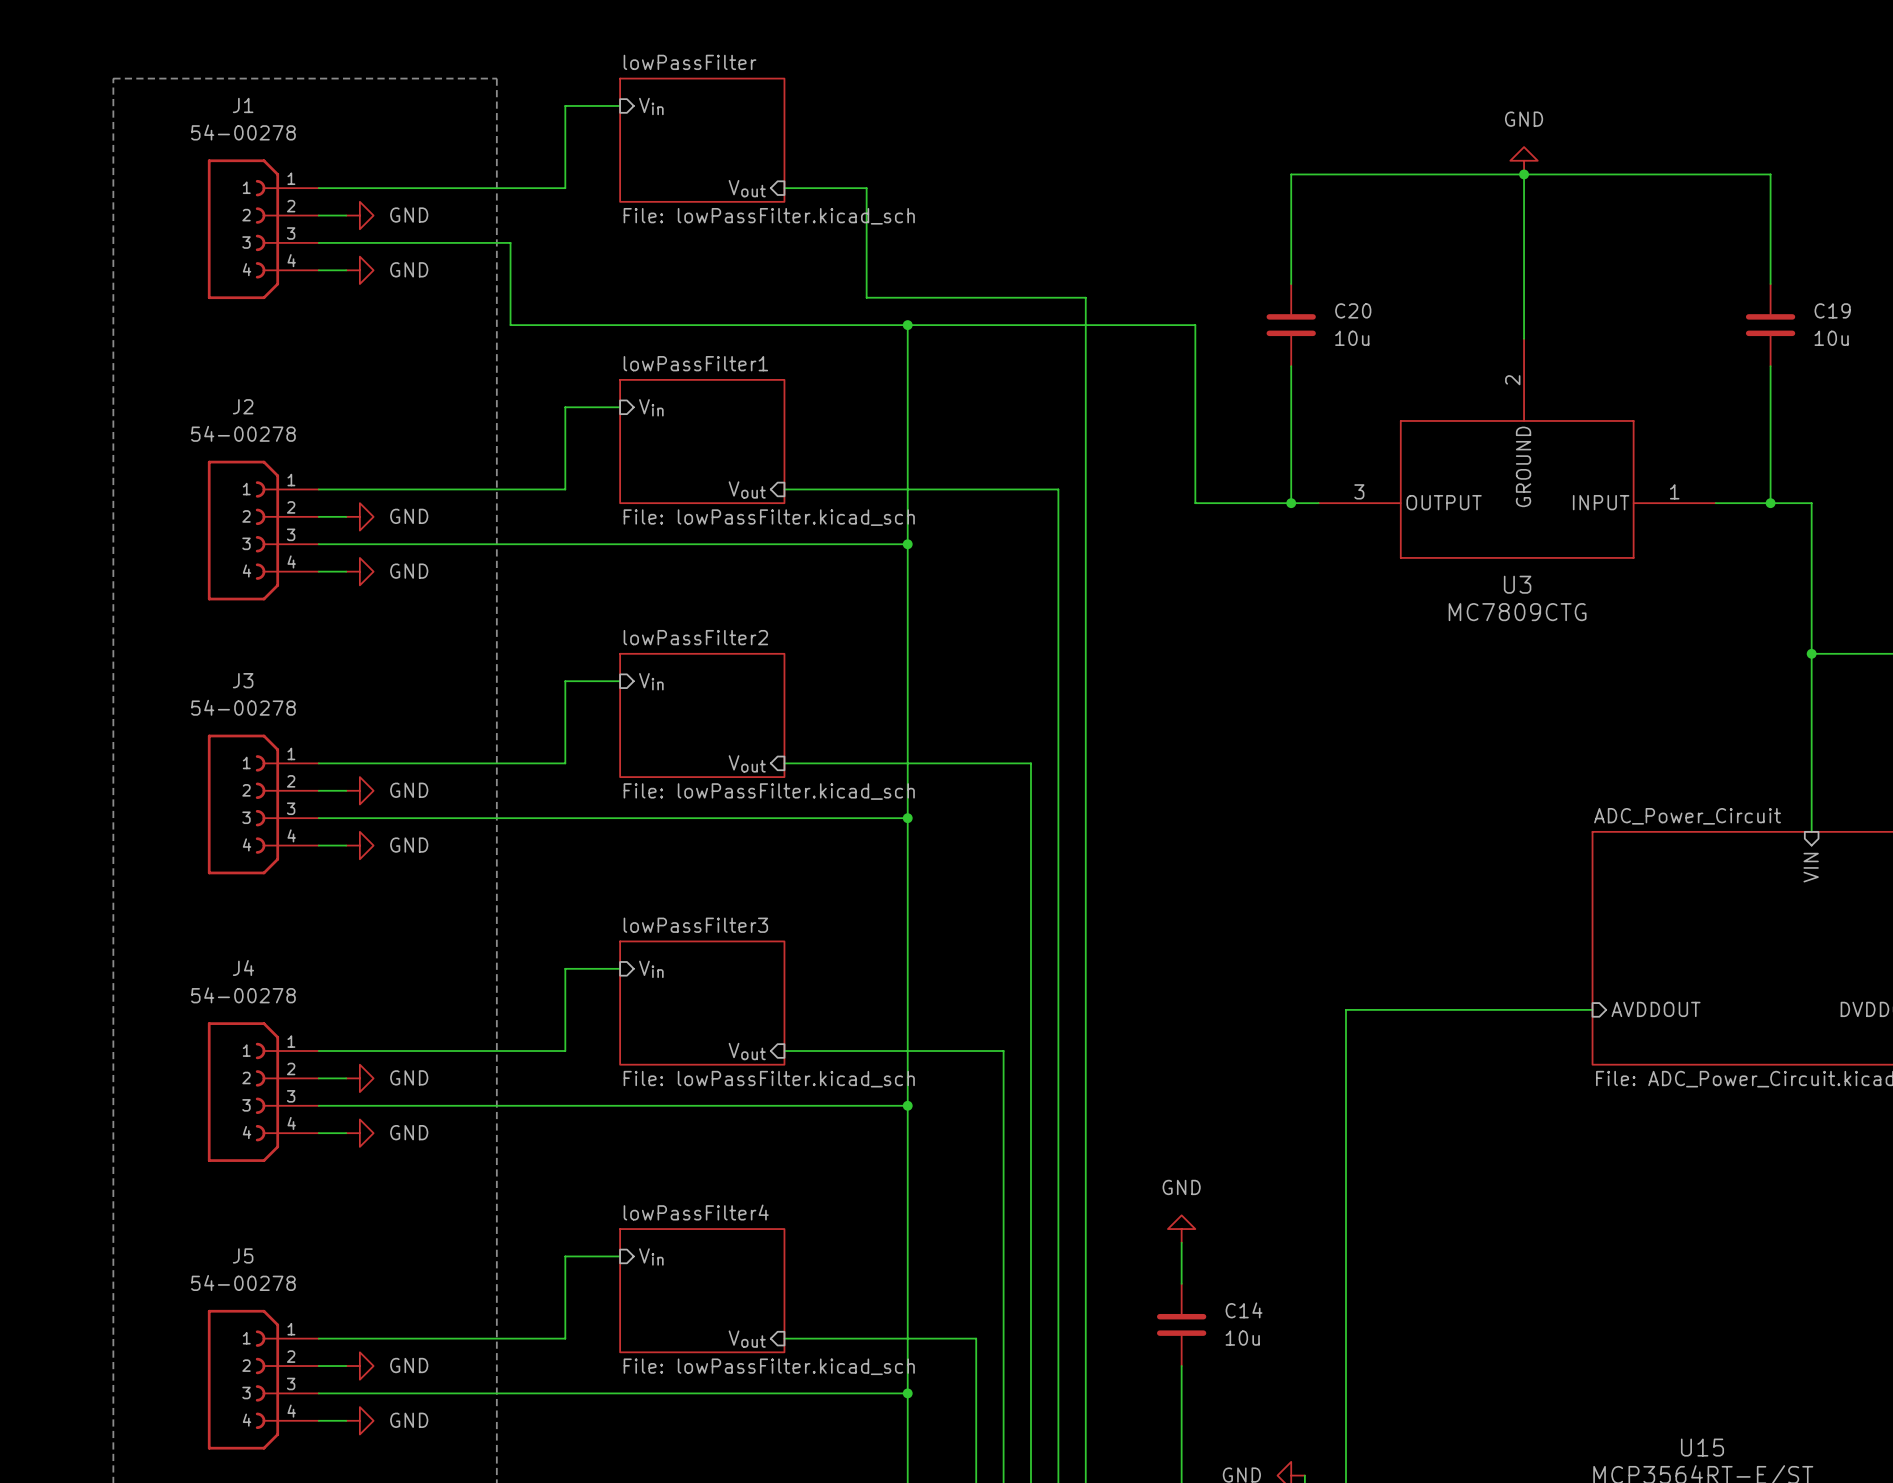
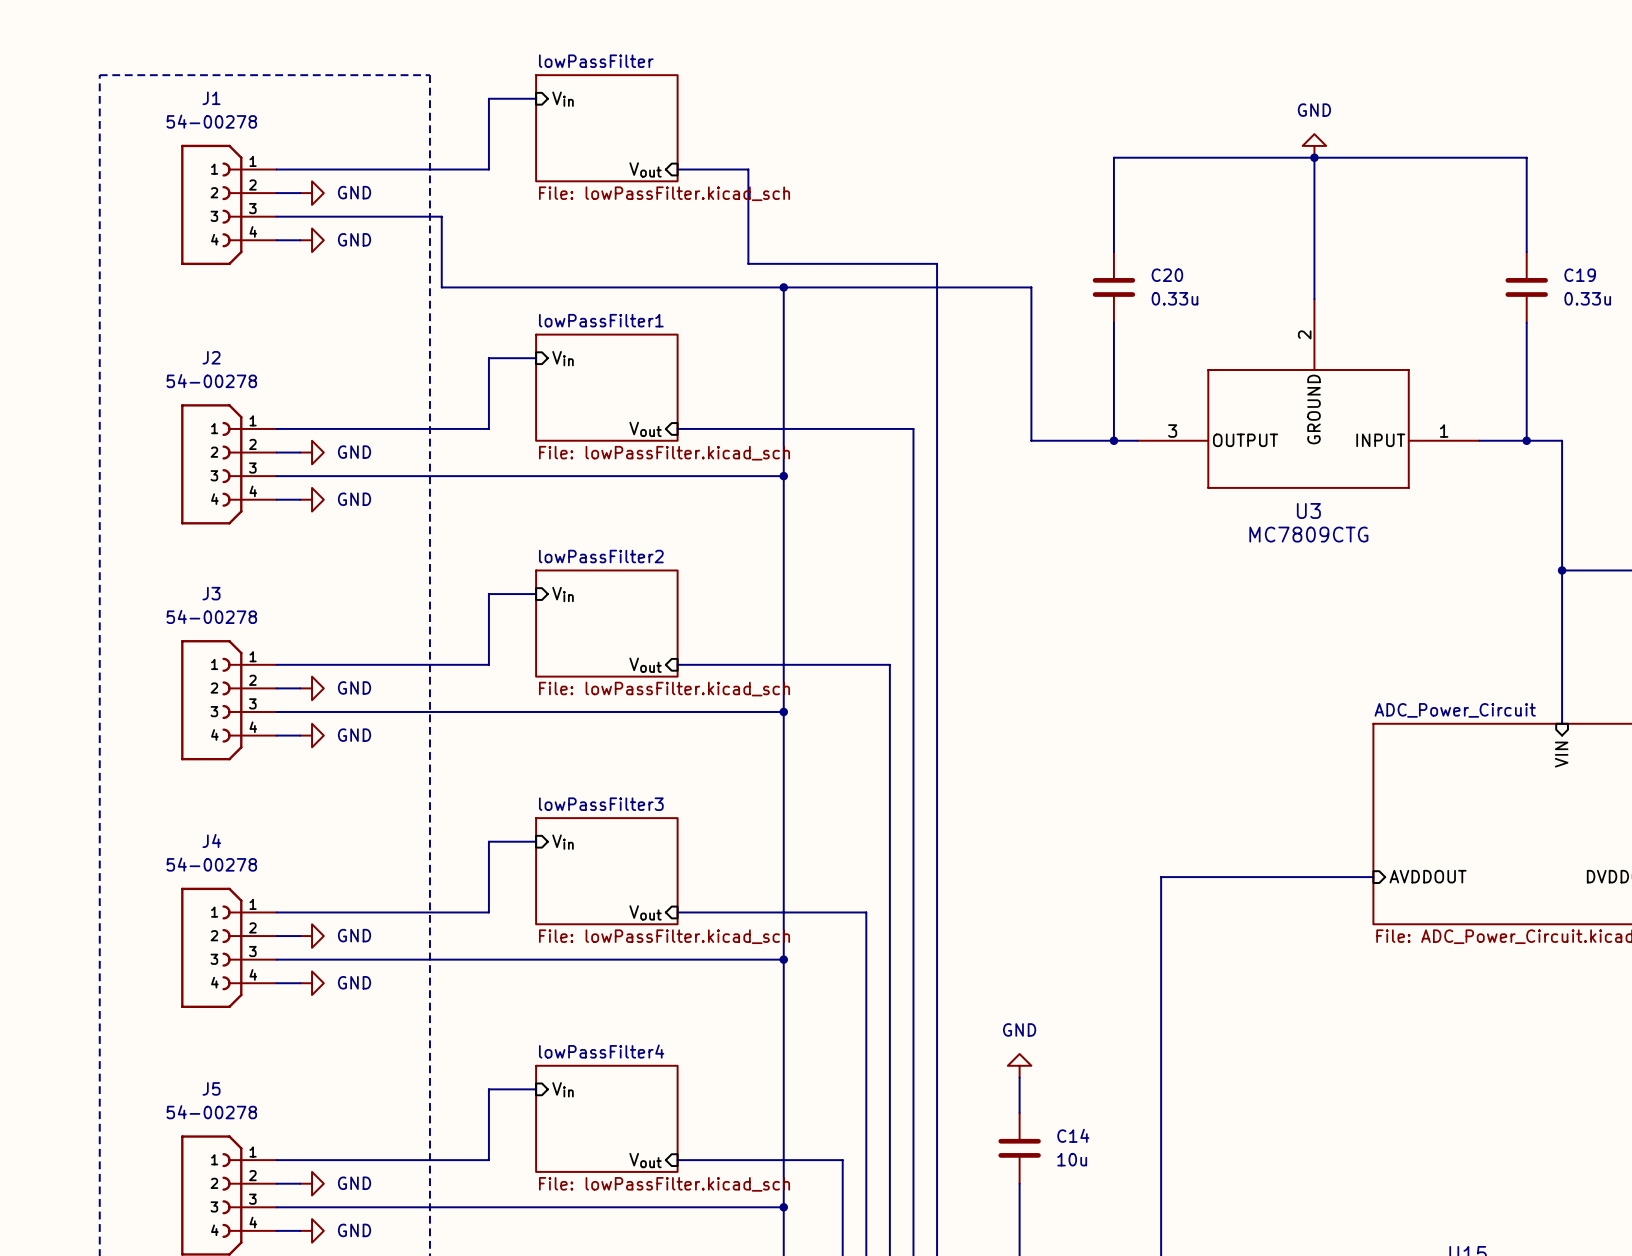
C20 value: 10u (1352, 338) -> 0.33u (1174, 298)
C19 value: 10u (1831, 338) -> 0.33u (1587, 298)

